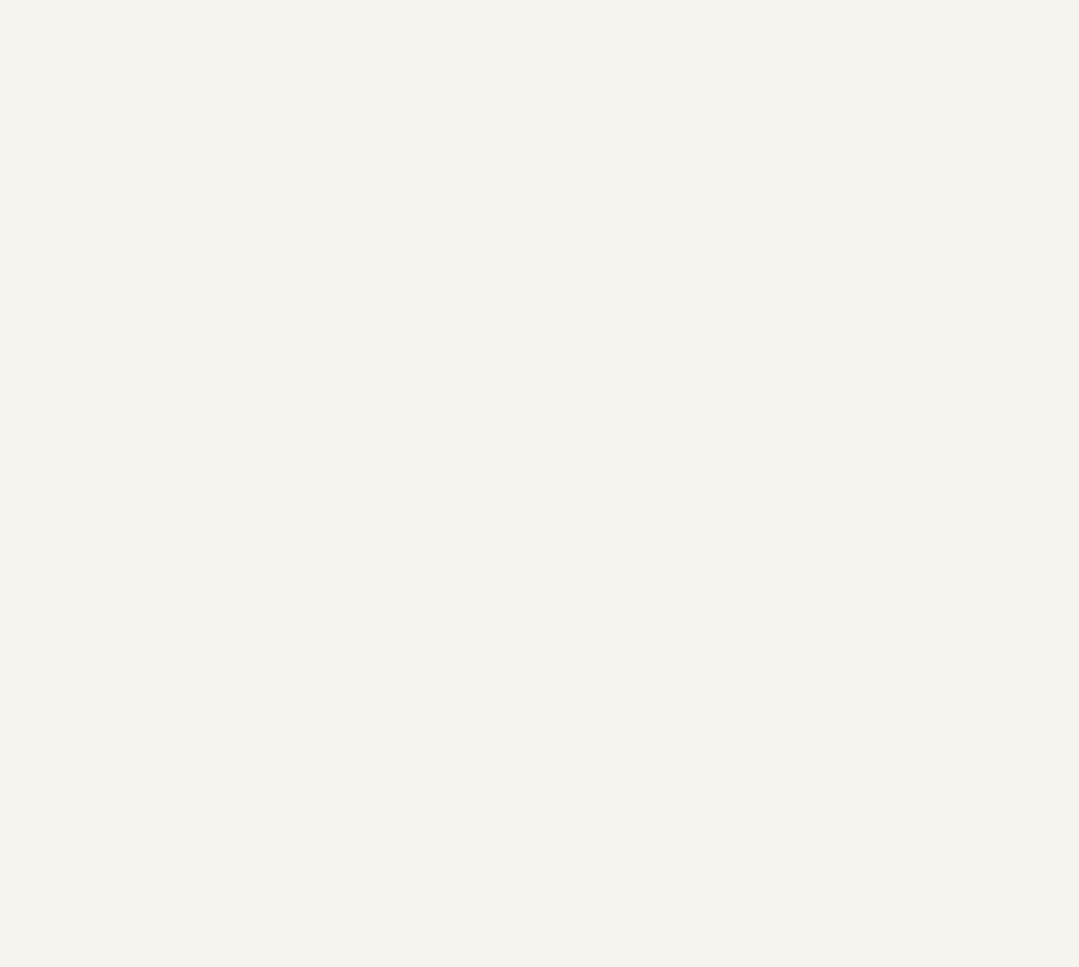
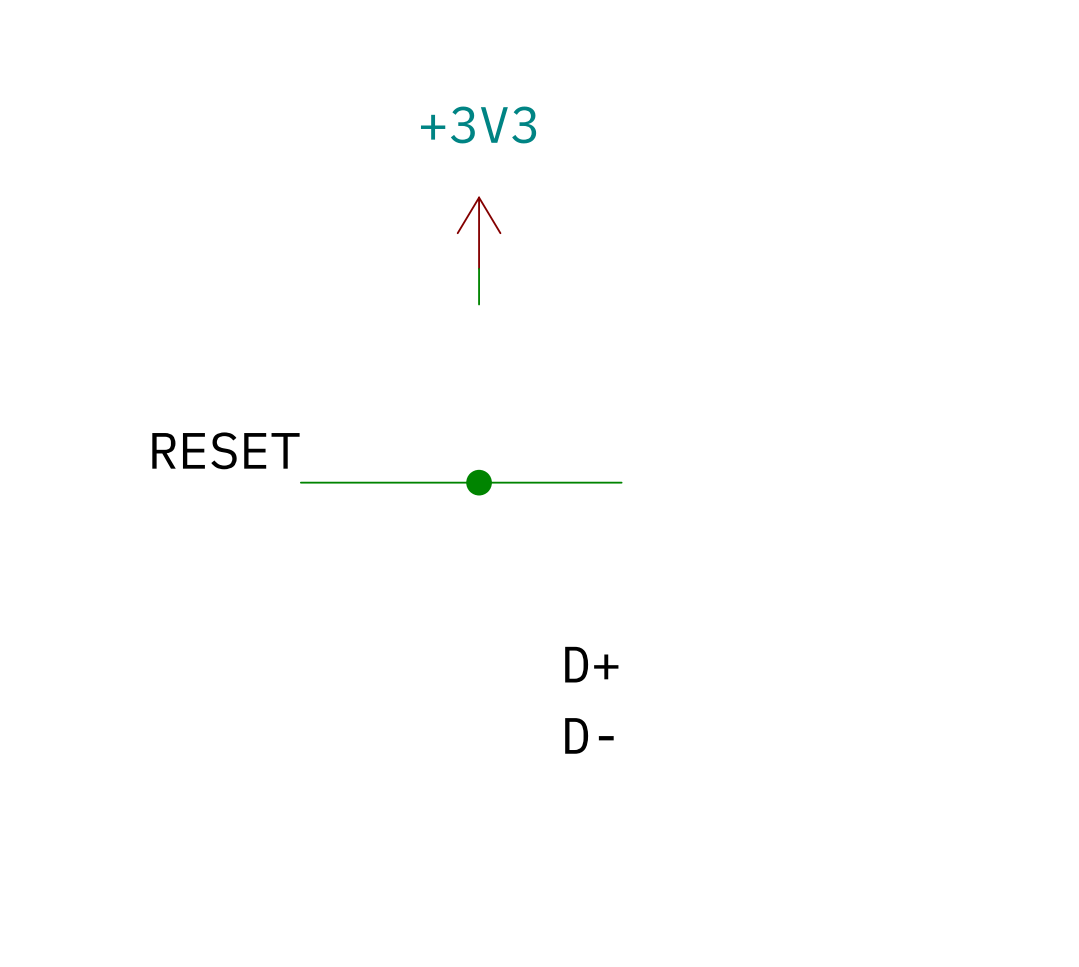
power symbol: none -> +3V3 (479, 233)
wire: none -> (479, 268) (479, 304)
label: none -> RESET (225, 450)
wire: none -> (300, 482) (621, 482)
junction: none -> (479, 482)
label: none -> D+ (591, 664)
label: none -> D- (589, 735)

